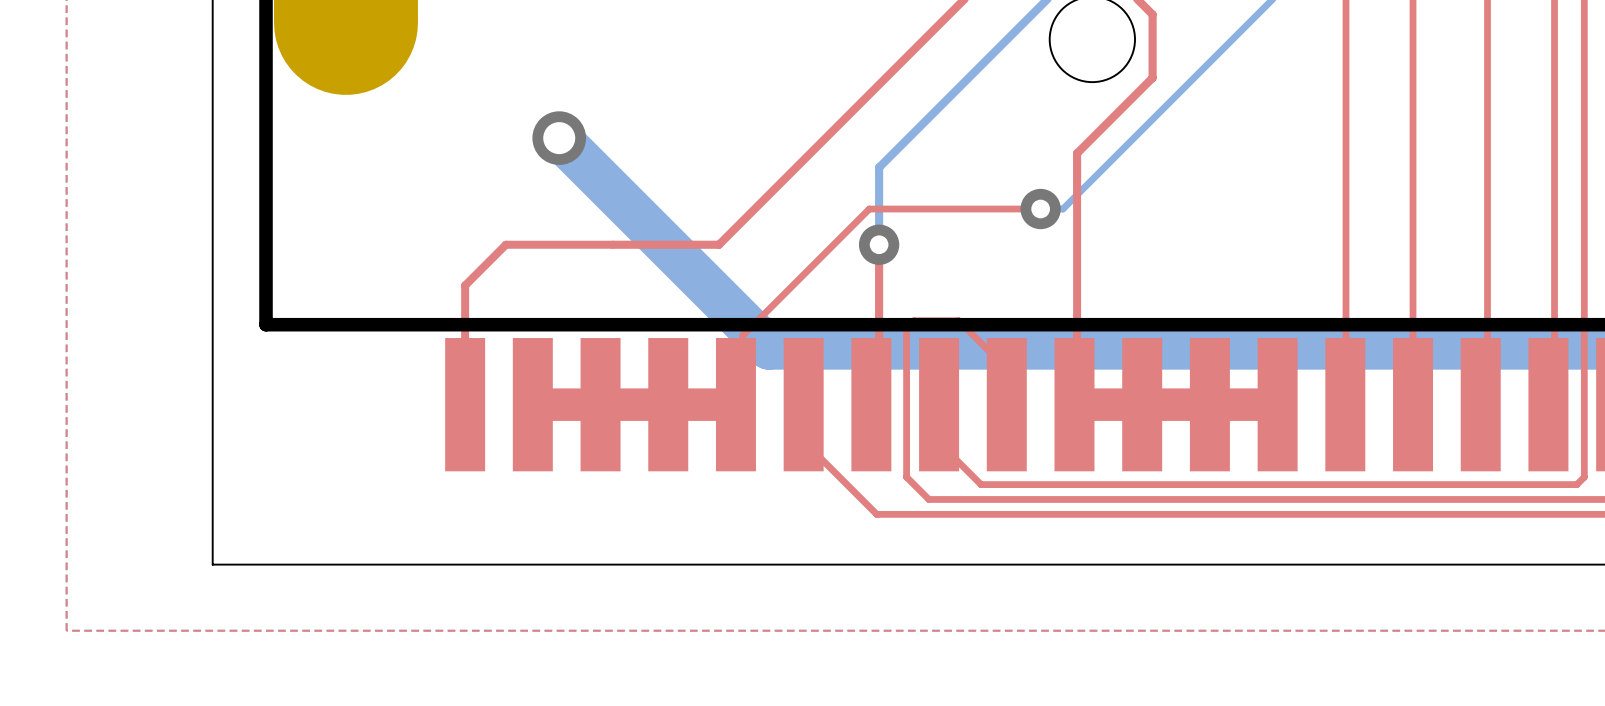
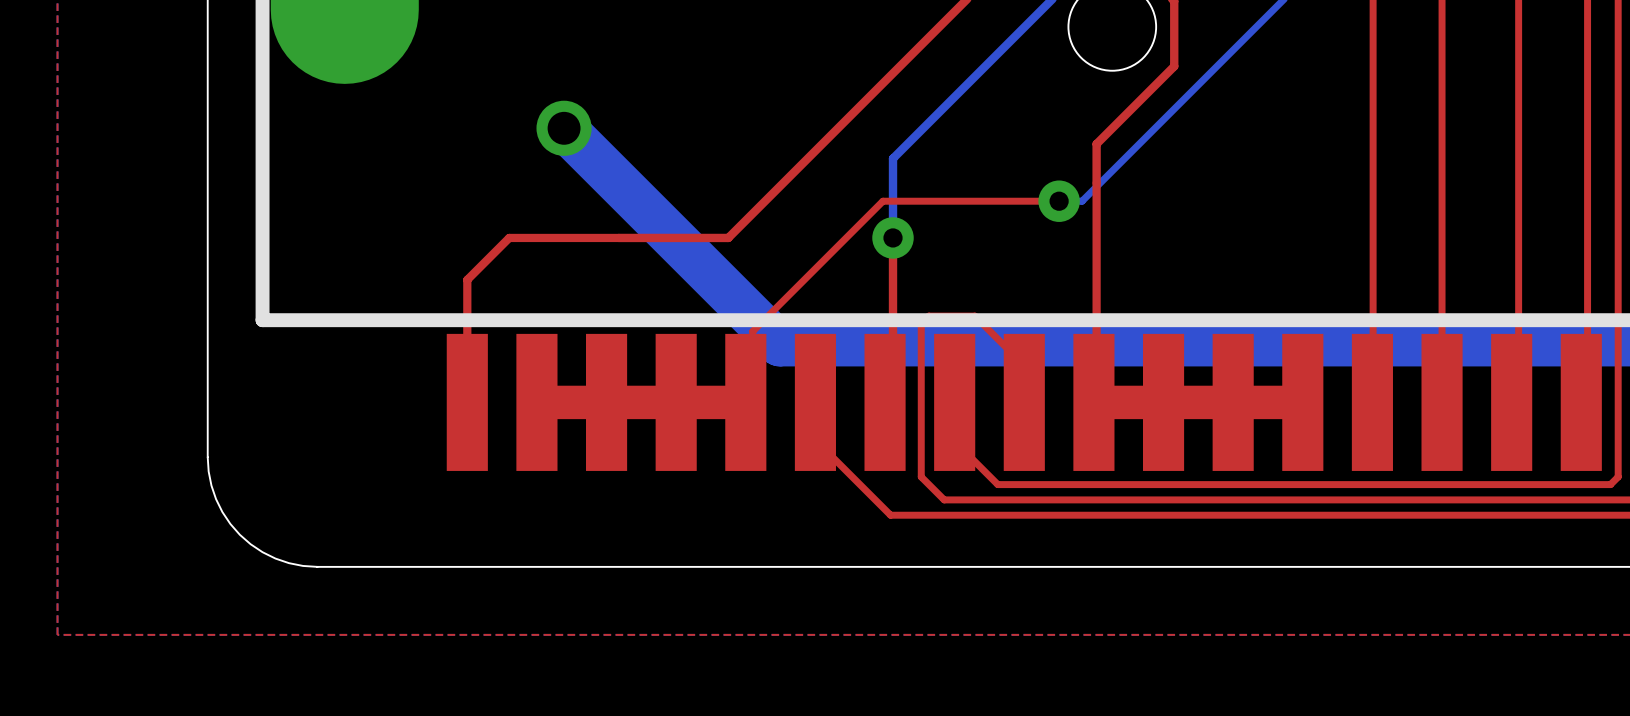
board edge: (212, 457) (212, 564) (319, 564) -> (207, 457) (211, 485) (216, 499) (222, 512) (239, 534) (262, 552) (275, 558) (289, 563) (317, 566)

